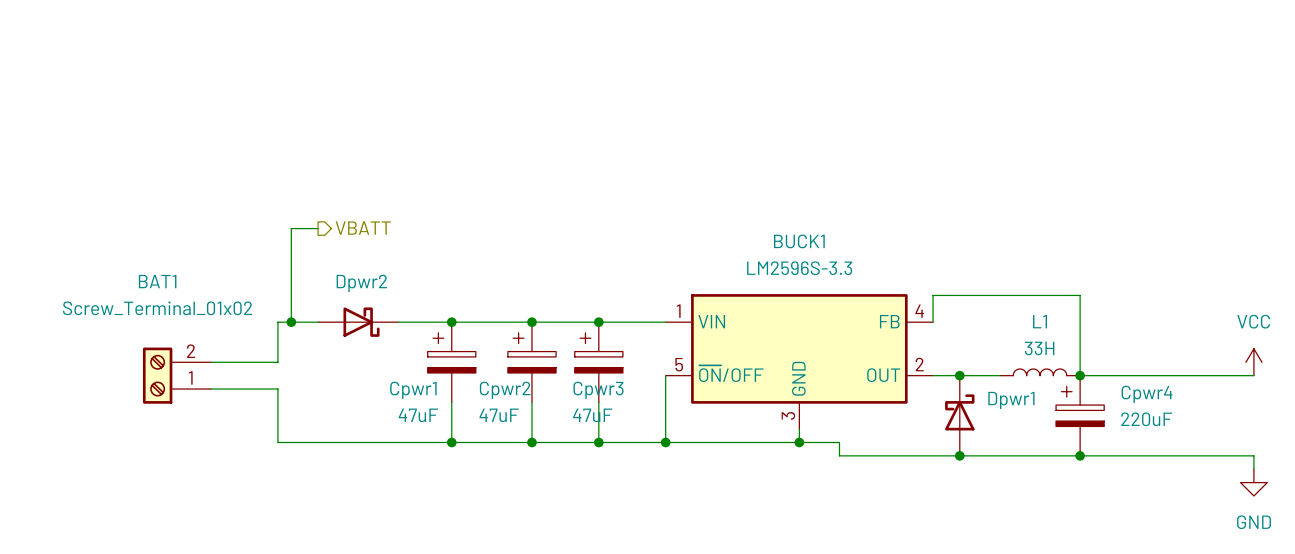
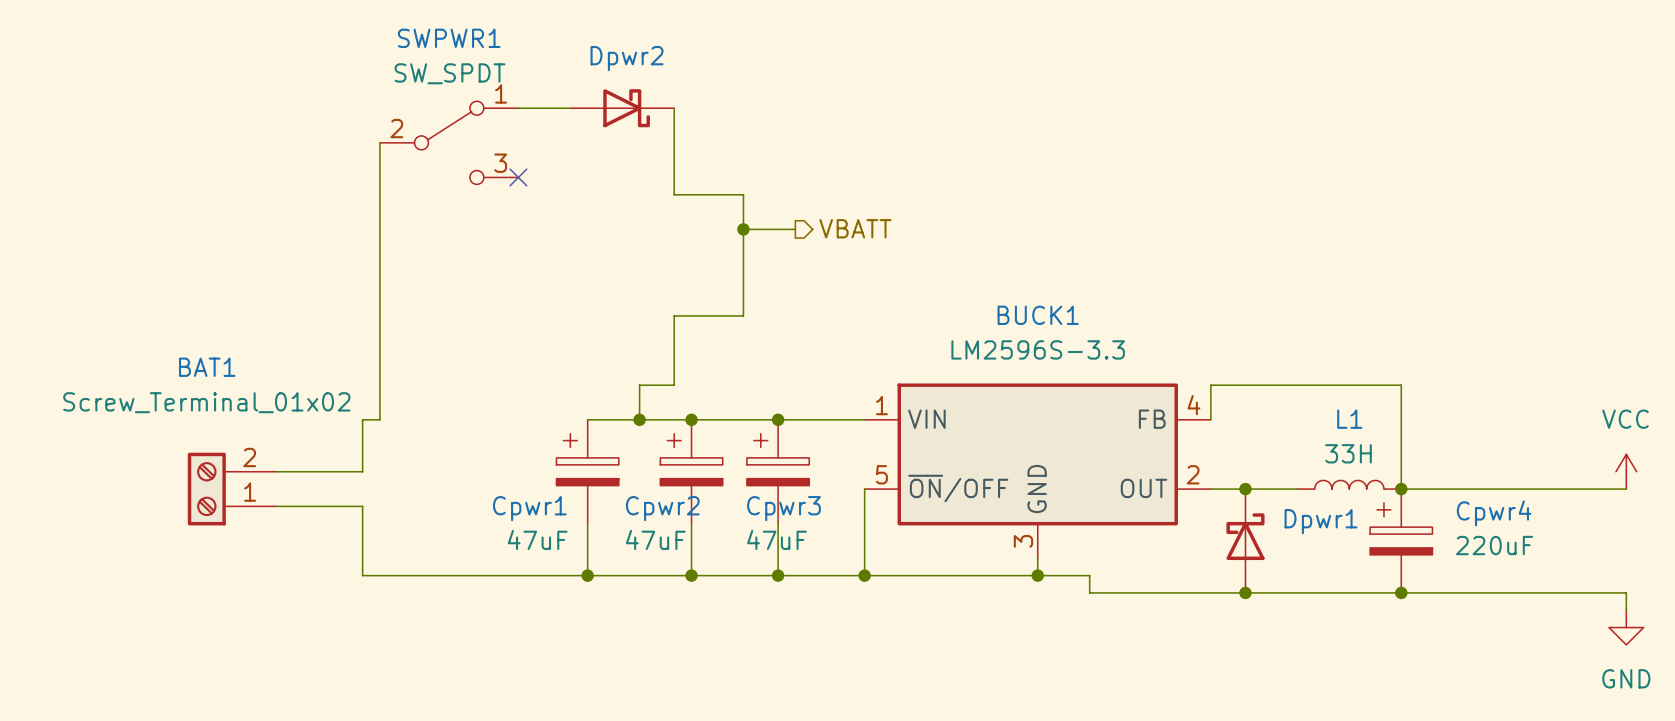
wire: none -> (518, 108) (570, 108)
wire: none -> (674, 108) (674, 194) (743, 194) (743, 315) (674, 315) (674, 385) (639, 385) (639, 419)
SWPWR1: none -> SW_SPDT (449, 142)
no-connect mark: none -> (518, 177)
hierarchical label: none -> VBATT (855, 228)
wire: none -> (743, 229) (795, 229)
junction: none -> (743, 229)
wire: (291, 228) (318, 228) -> (379, 298) (379, 142)
hierarchical label: VBATT (363, 228) -> none
wire: (291, 322) (318, 322) -> none
junction: (291, 322) -> none
Dpwr2 position: (358, 322) -> (622, 108)
wire: (398, 322) (451, 322) -> none
junction position: (451, 322) -> (639, 419)

